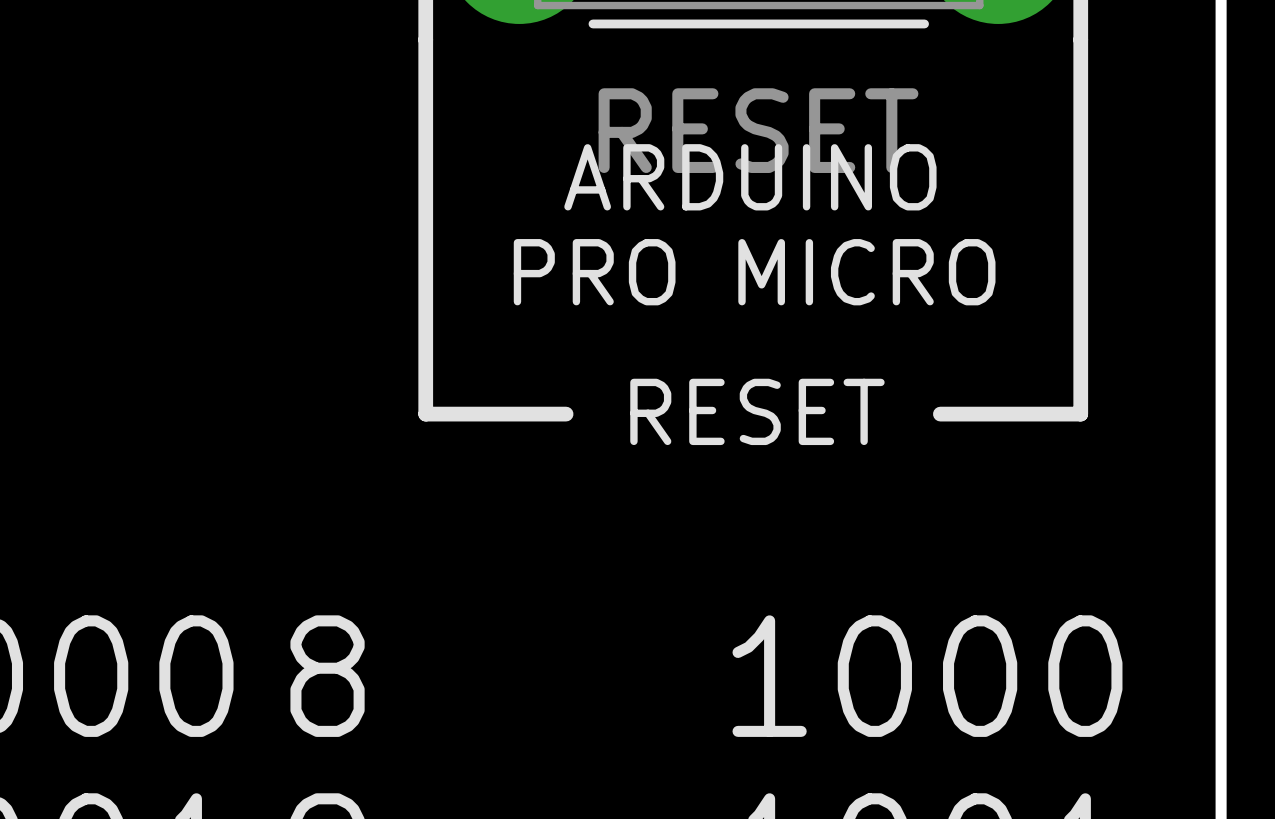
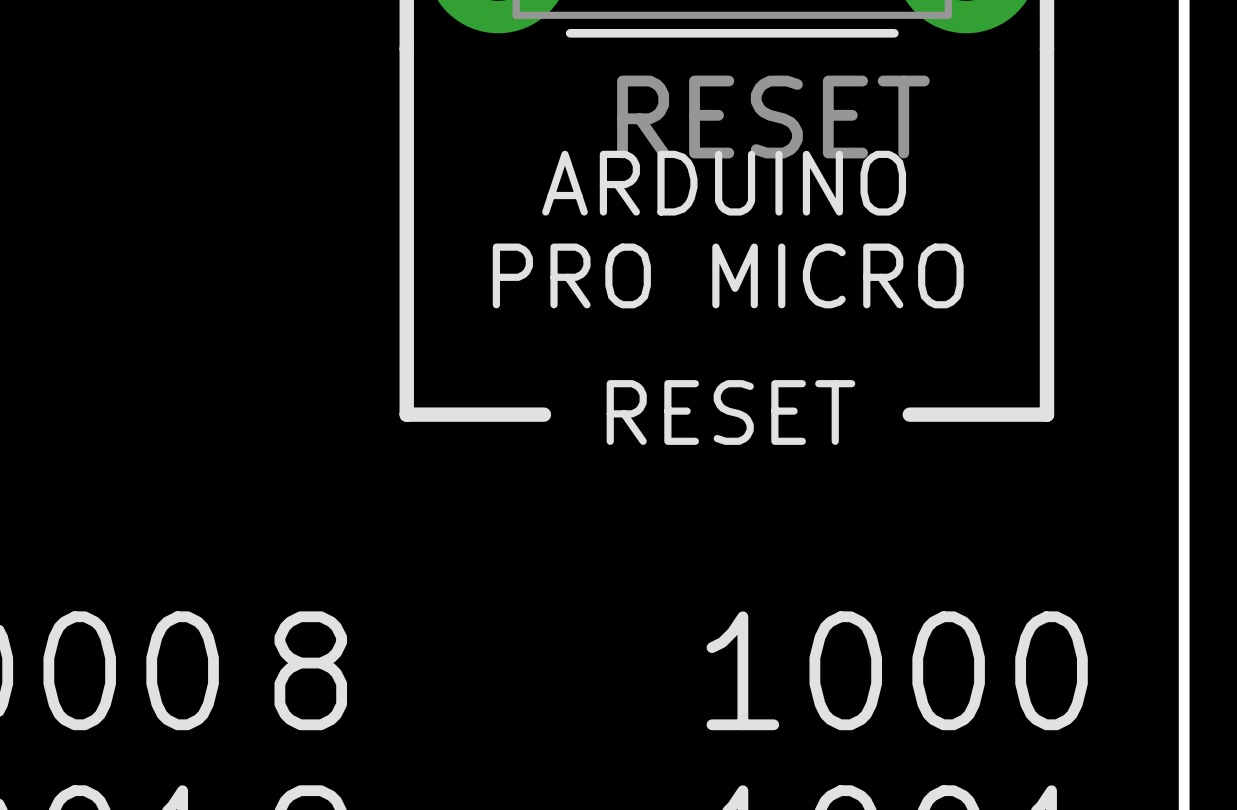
part value position: RESET (758, 130) -> RESET (773, 117)

